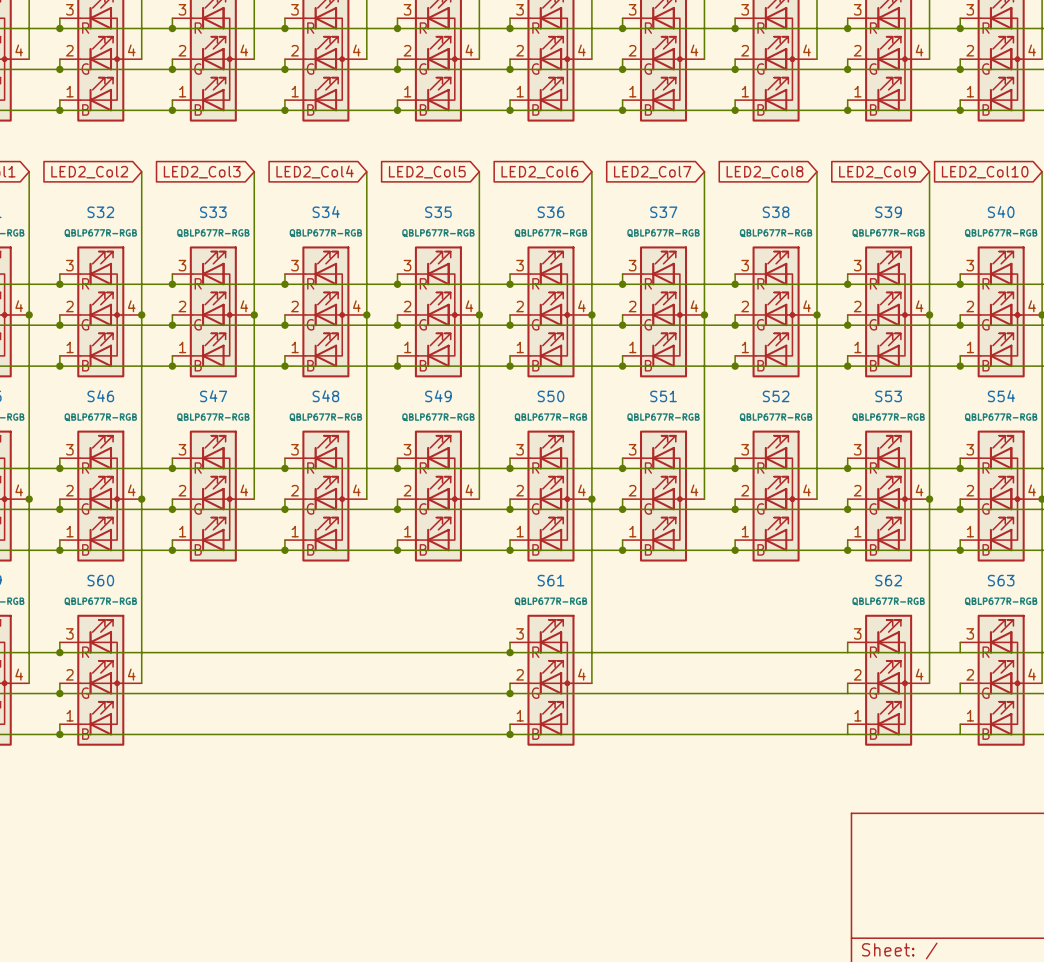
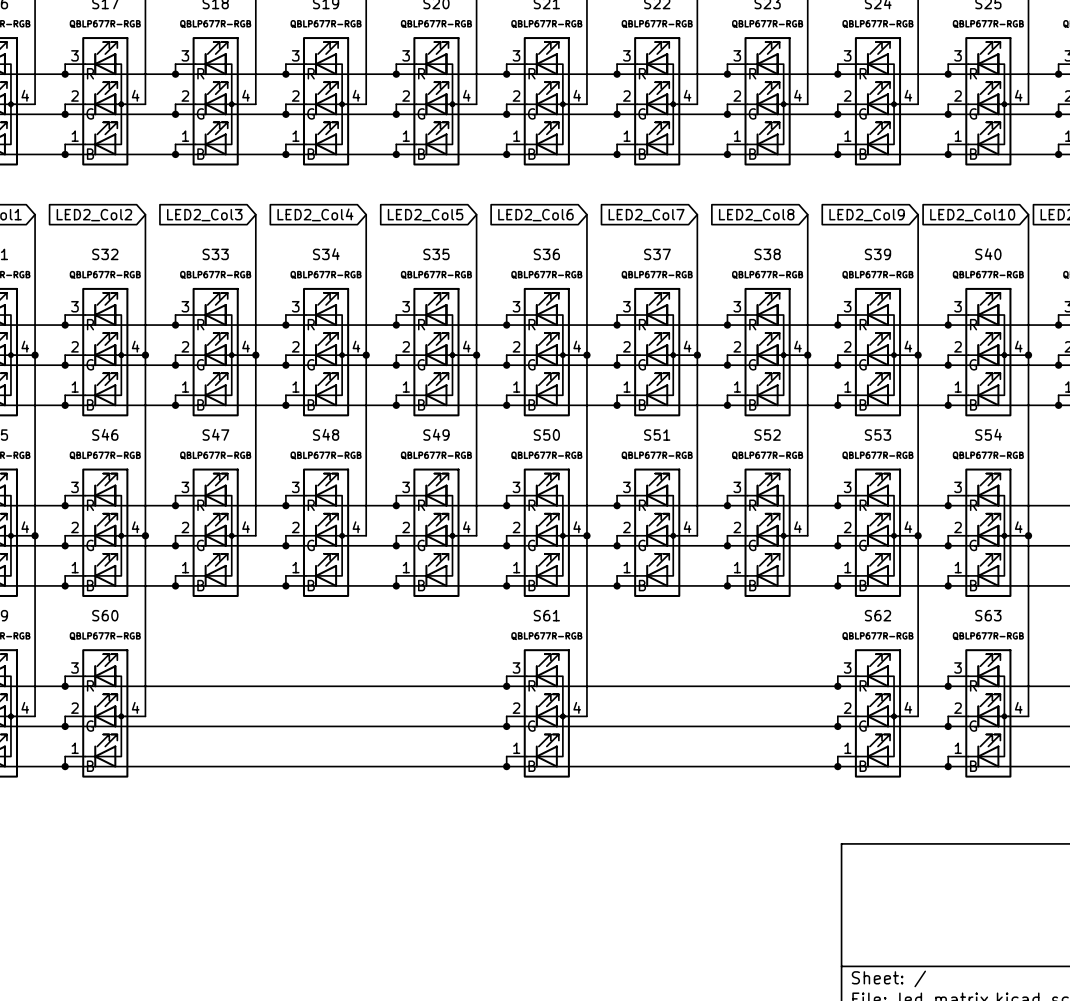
junction: none -> (837, 686)
junction: none -> (948, 686)
junction: none -> (837, 726)
junction: none -> (948, 726)
junction: none -> (837, 766)
junction: none -> (948, 766)

